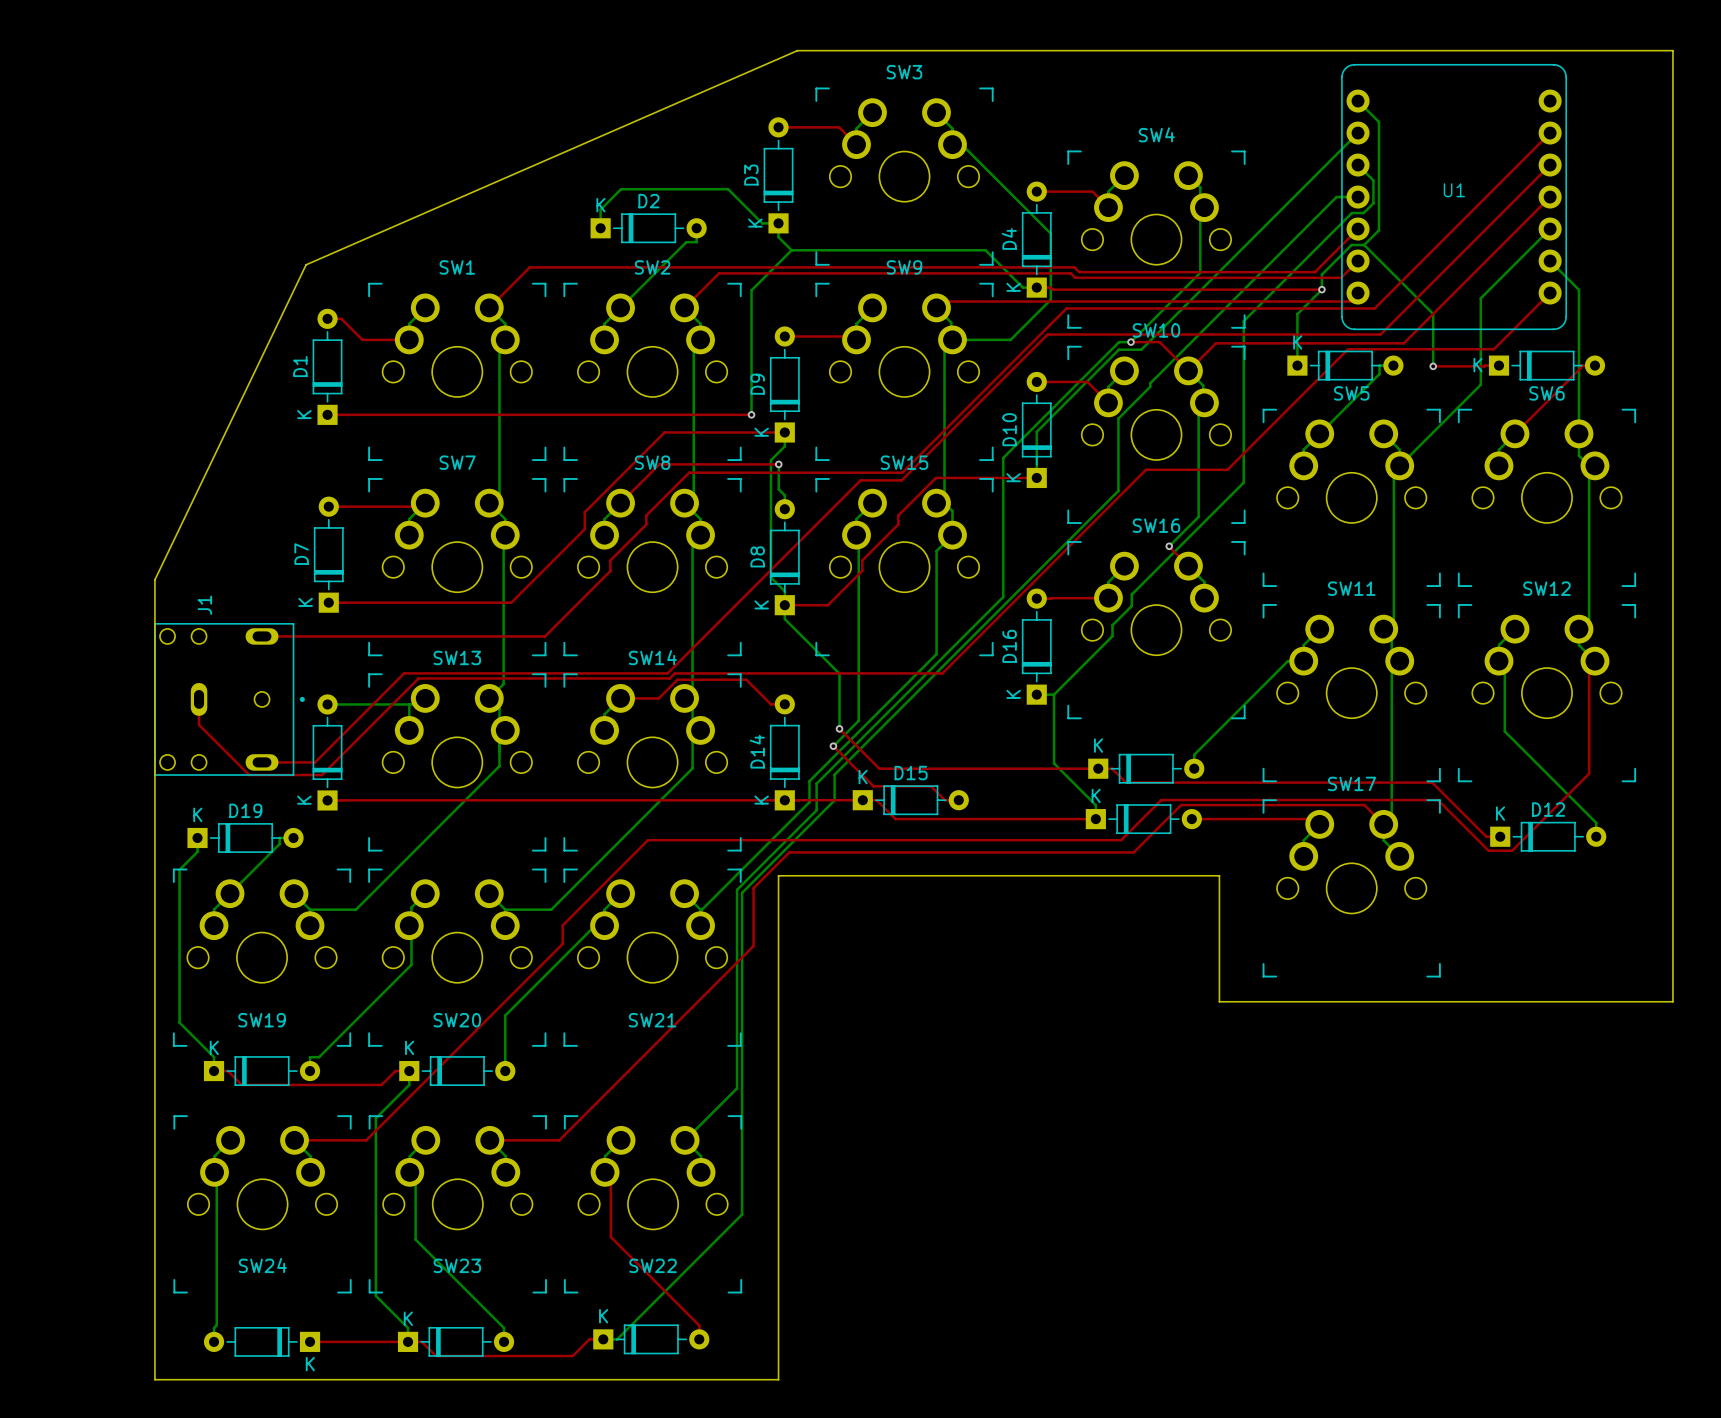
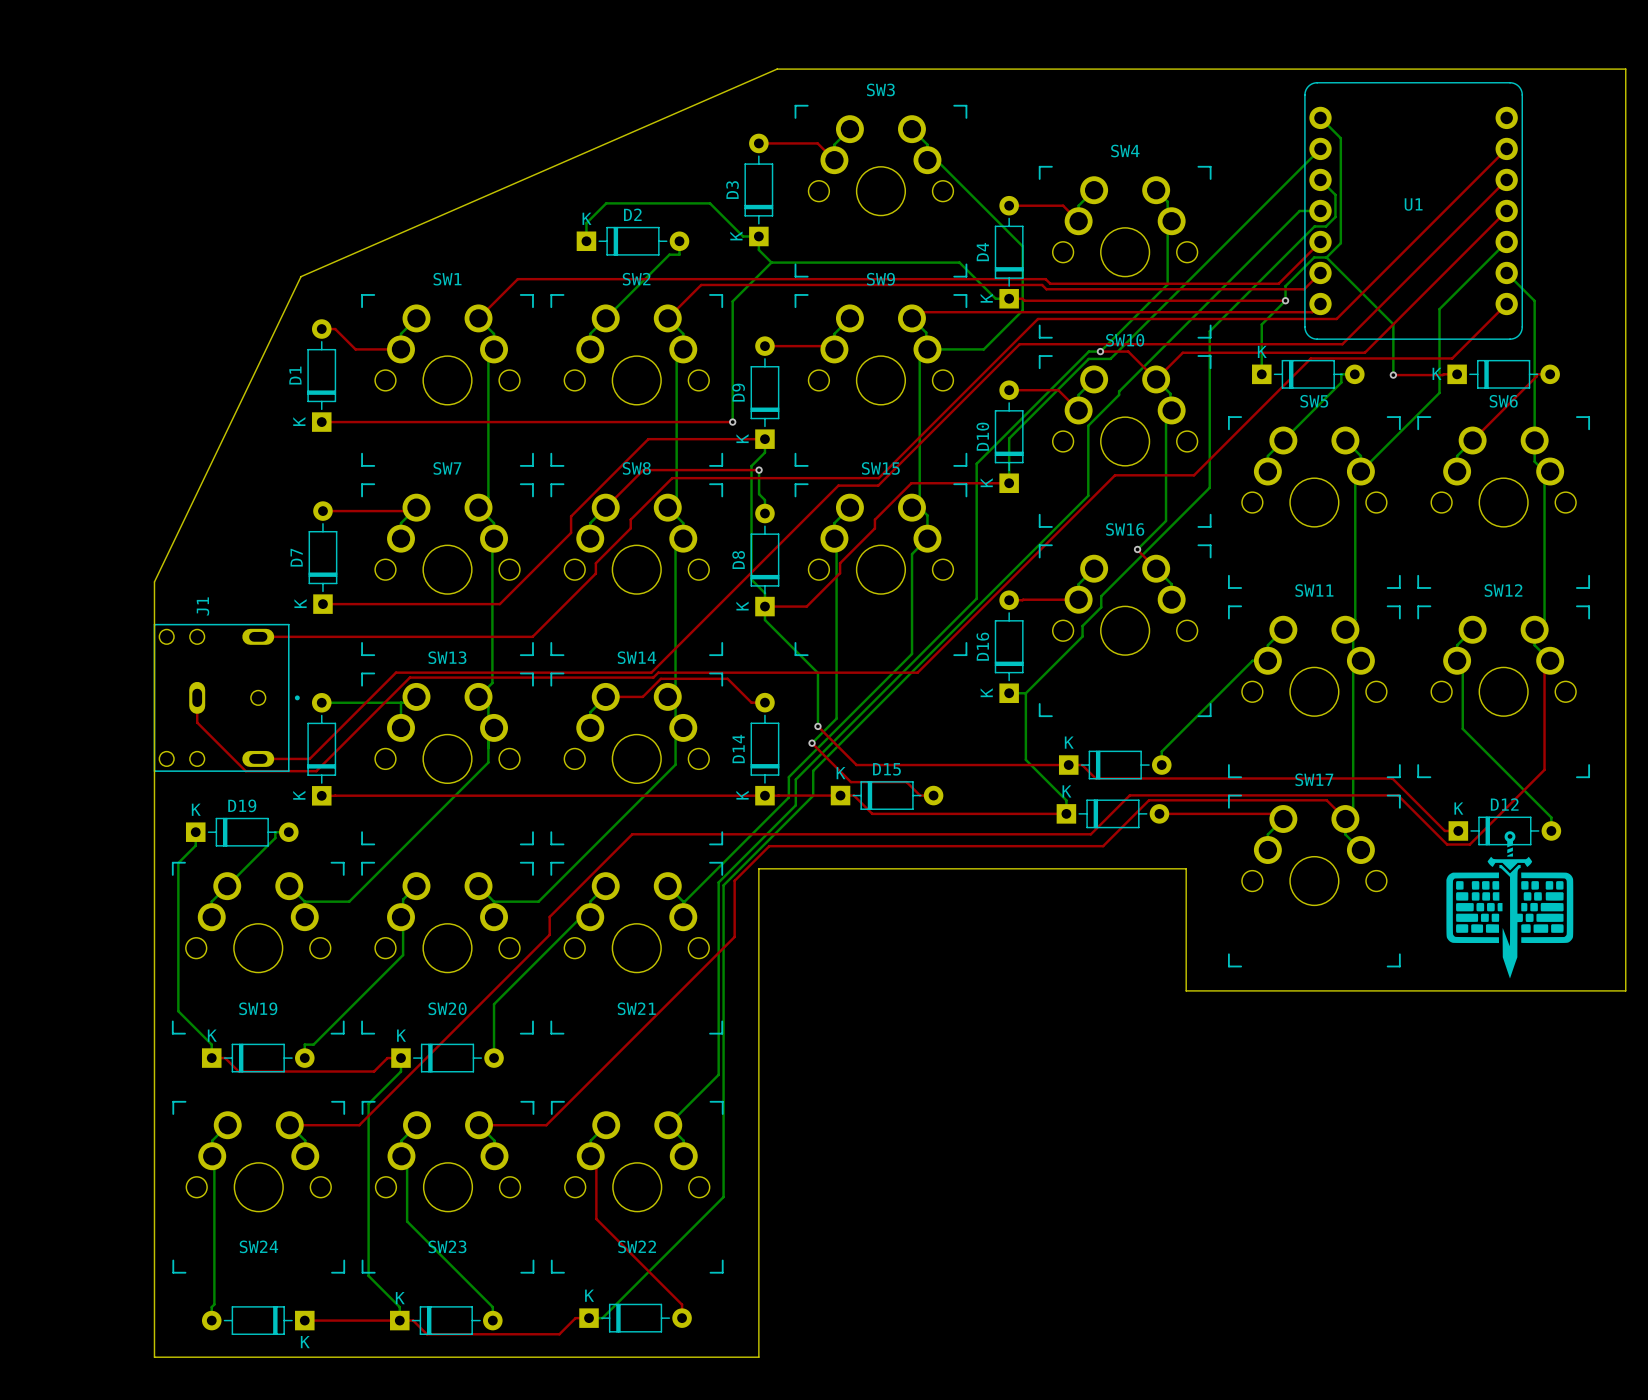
drawing: none -> [1446, 831, 1574, 979]

